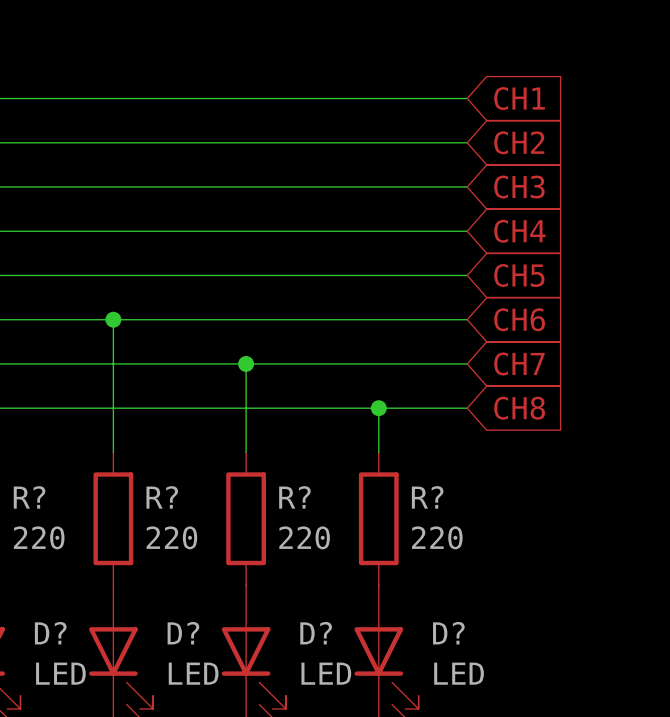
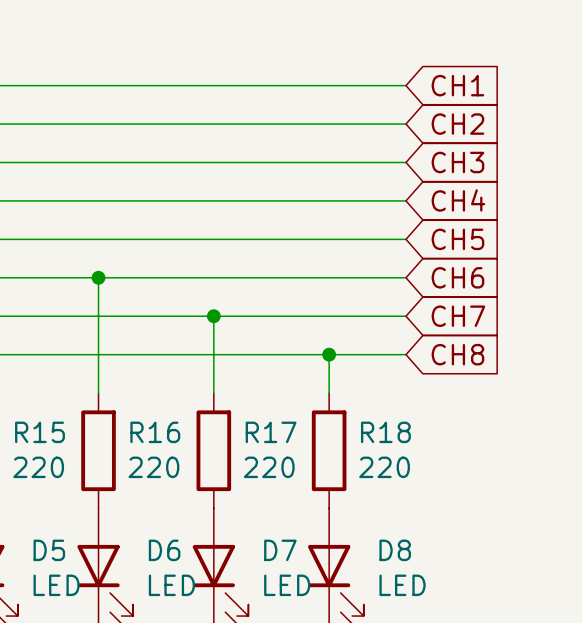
R? name: R? (29, 497) -> R15 (40, 432)
R? name: R? (162, 497) -> R16 (155, 432)
R? name: R? (294, 497) -> R17 (271, 432)
R? name: R? (427, 497) -> R18 (385, 432)
D? name: D? (50, 633) -> D5 (49, 550)
D? name: D? (183, 633) -> D6 (164, 550)
D? name: D? (316, 633) -> D7 (280, 550)
D? name: D? (448, 633) -> D8 (395, 550)

